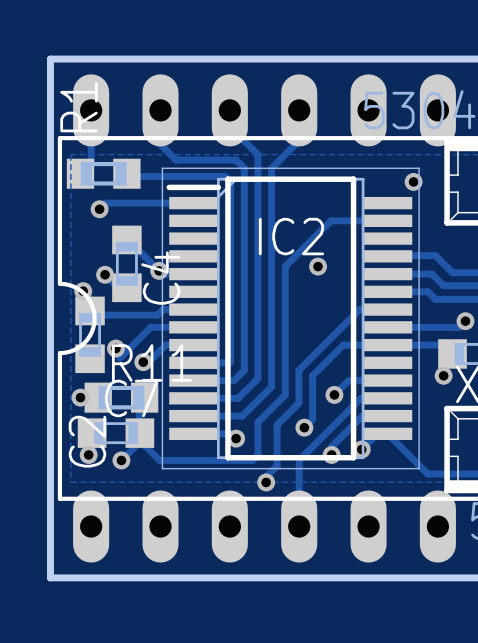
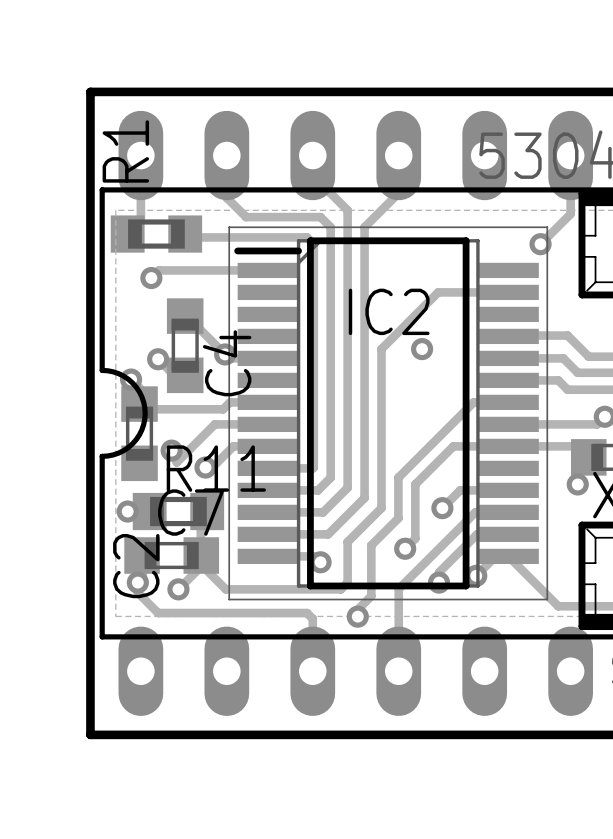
track: none -> (570, 155) (570, 214) (540, 244)
track: none -> (137, 582) (137, 592) (158, 613) (307, 613) (312, 618) (312, 671)

